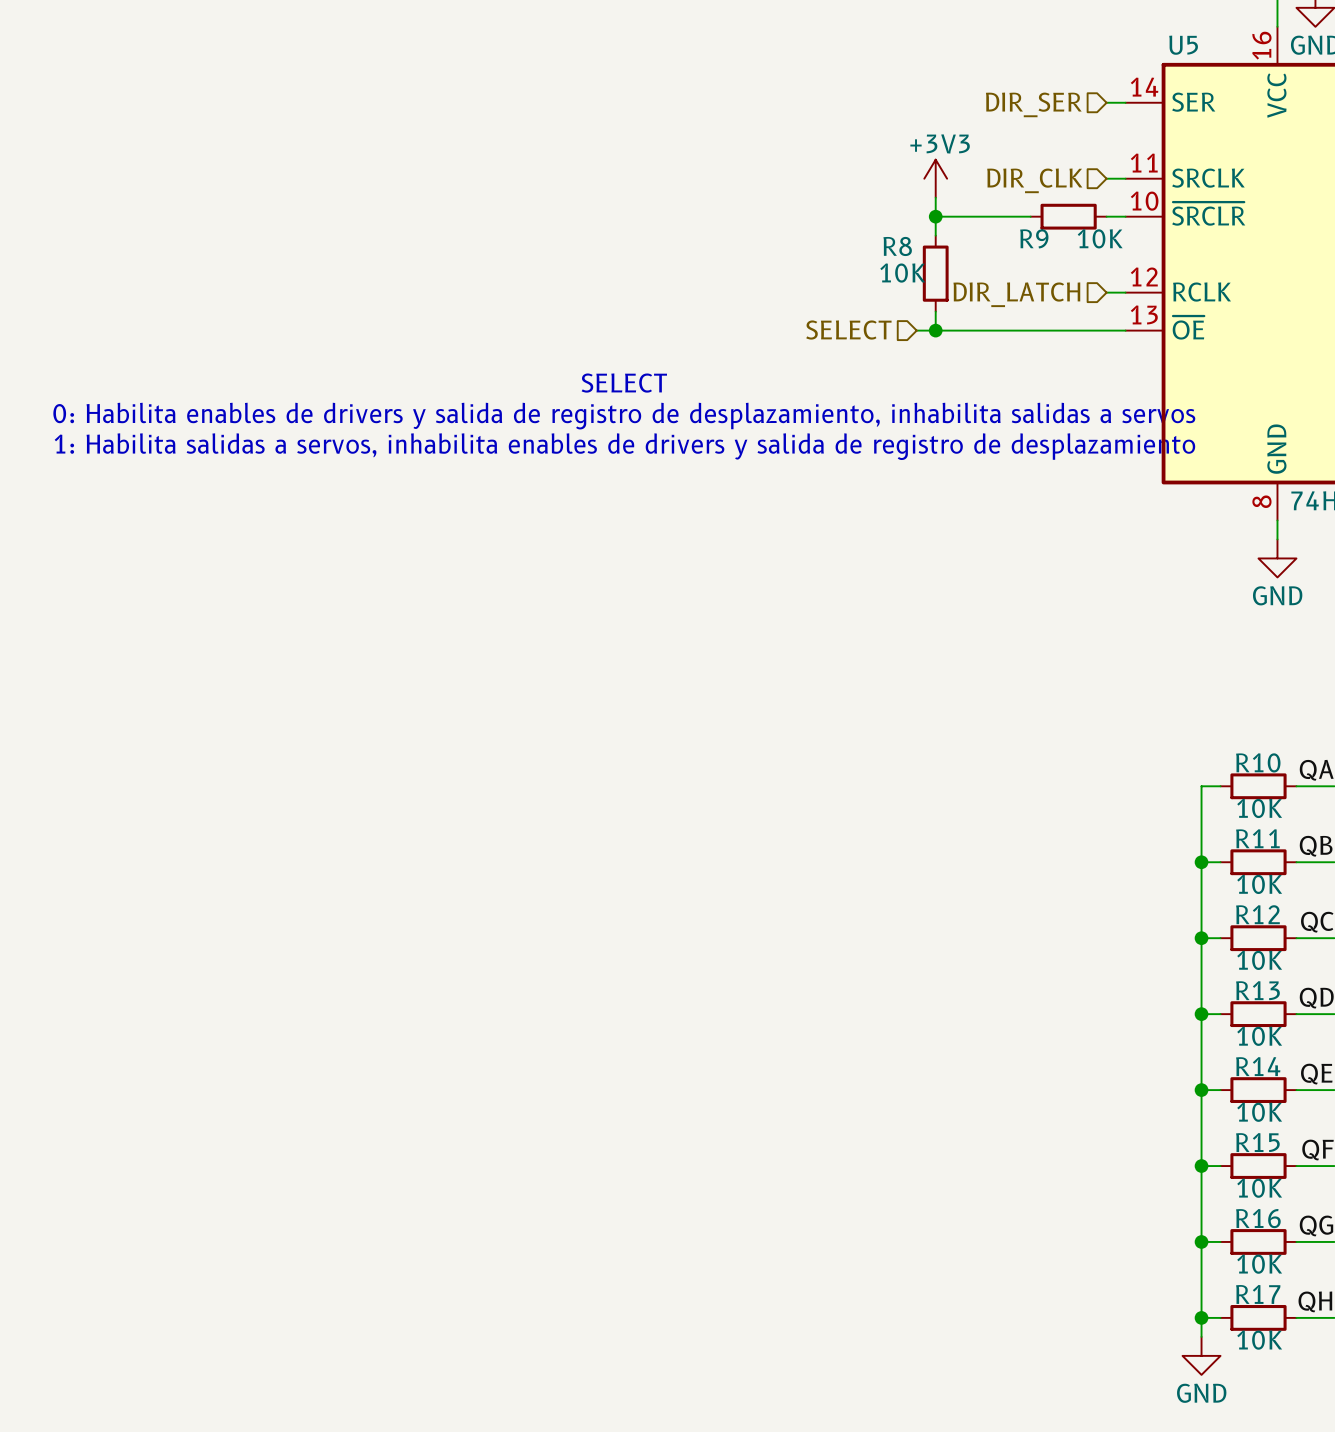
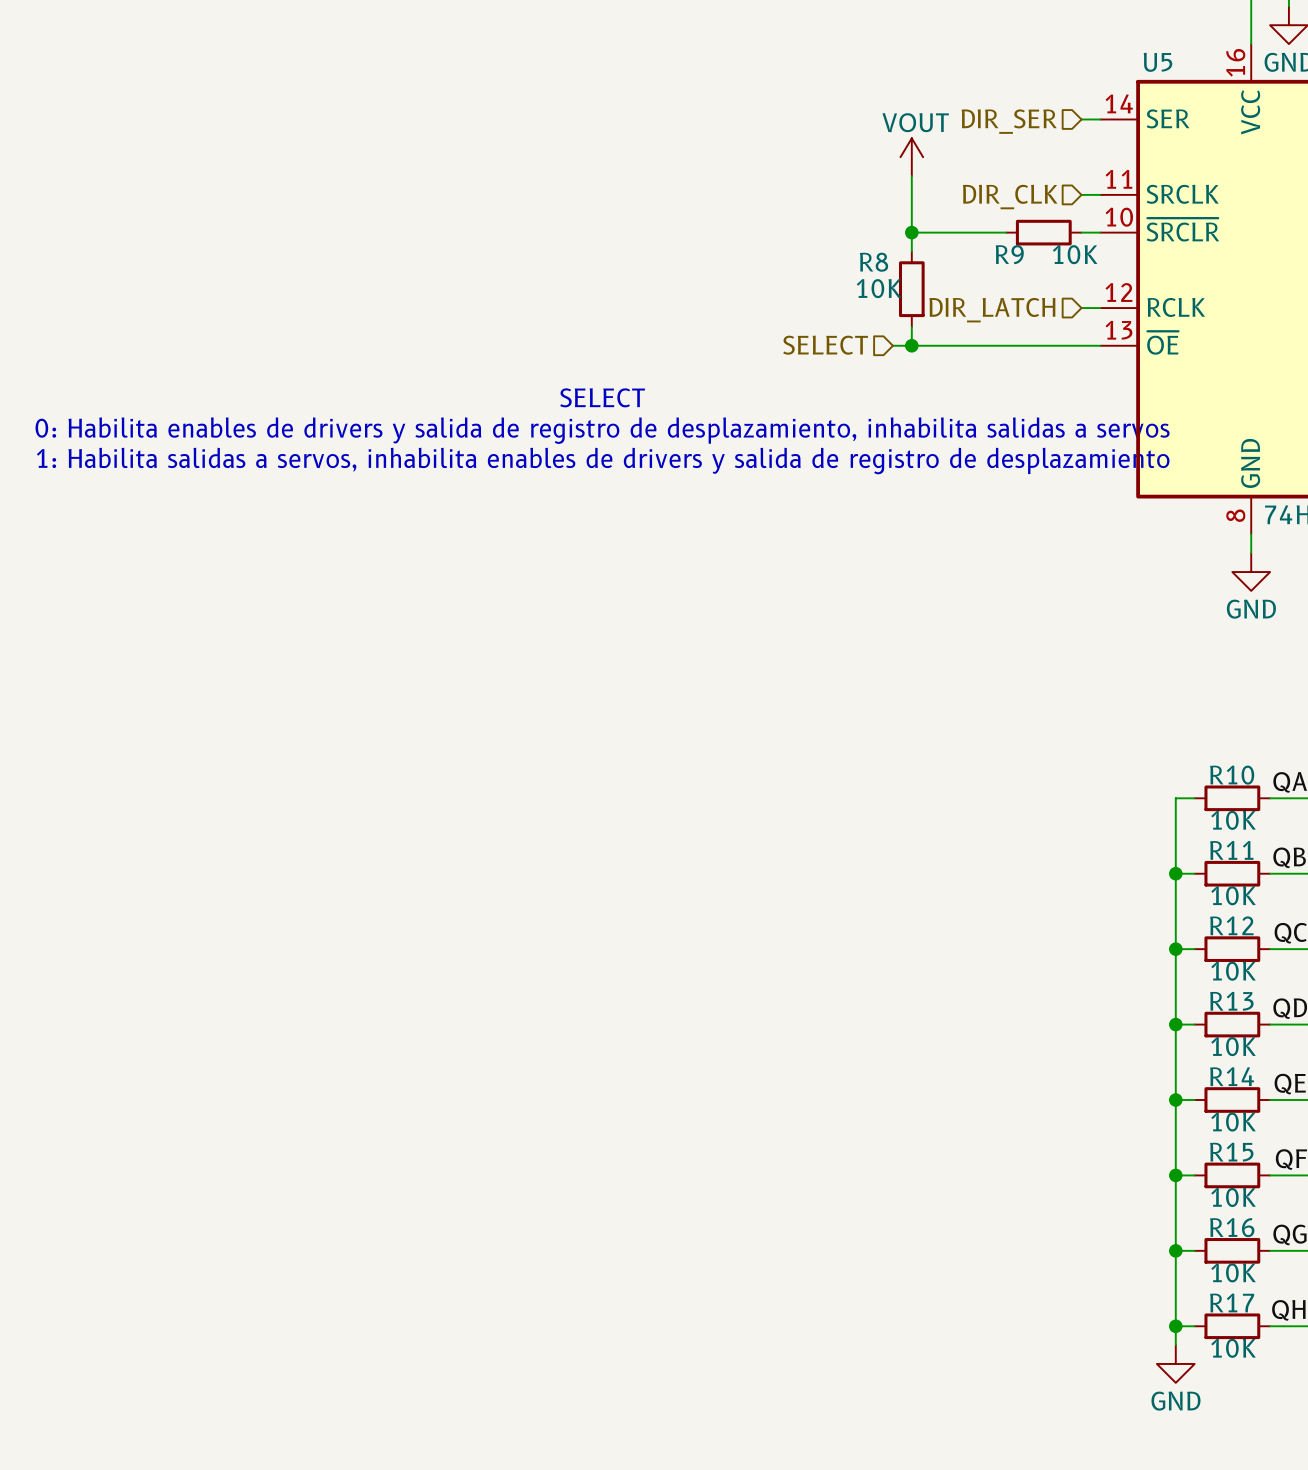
power symbol: none -> VOUT (911, 157)
power symbol: +3V3 (935, 178) -> none

